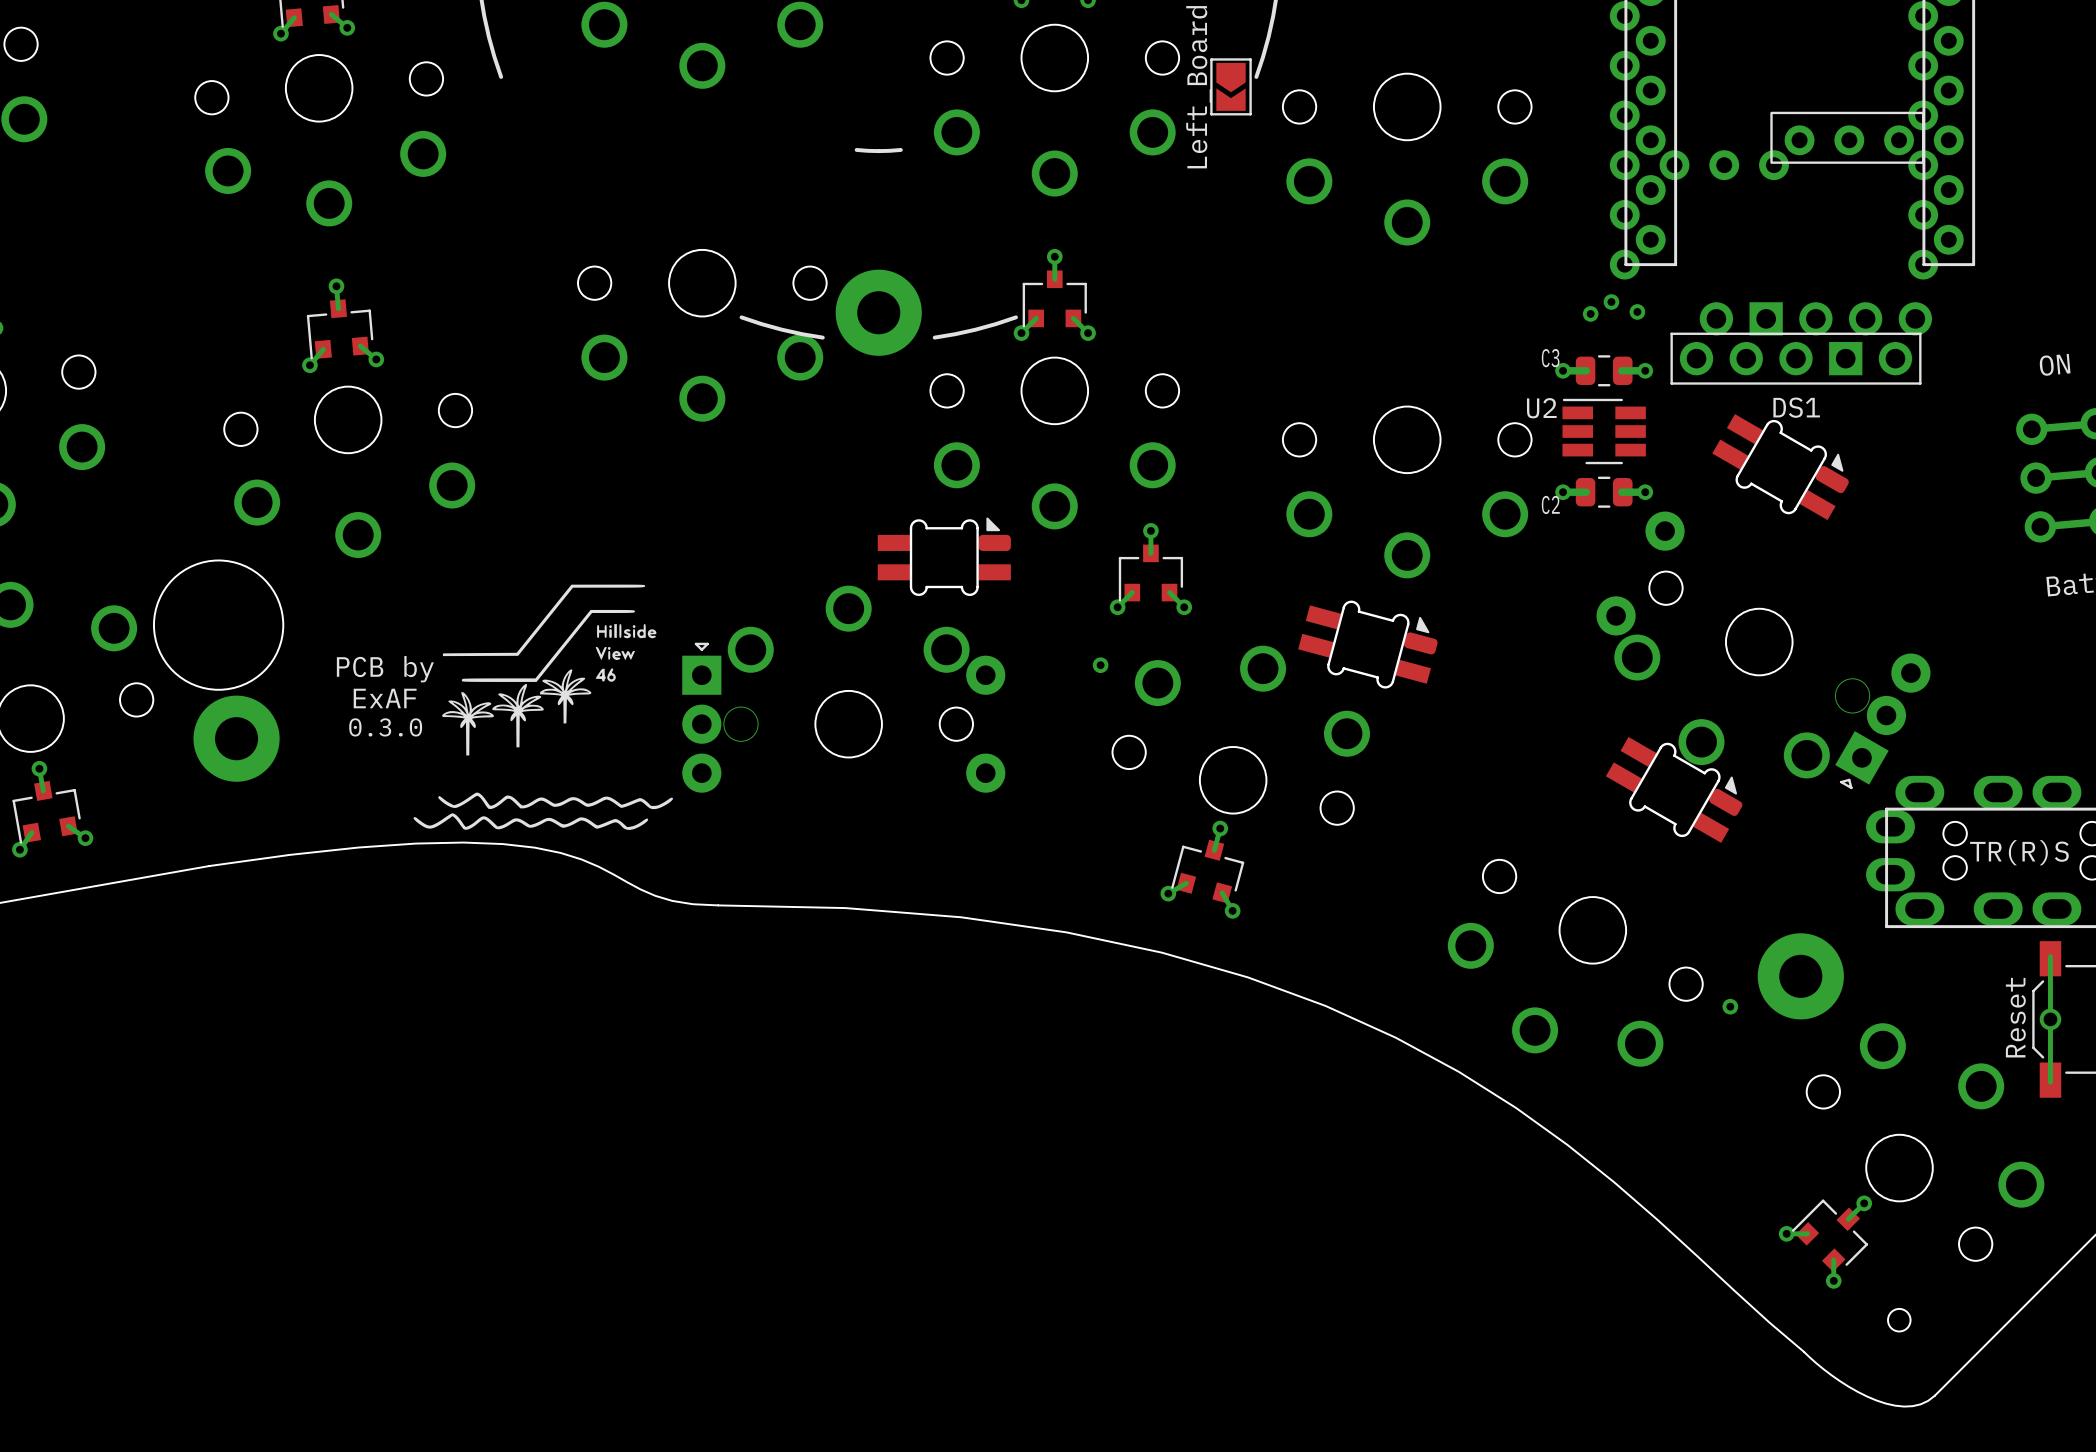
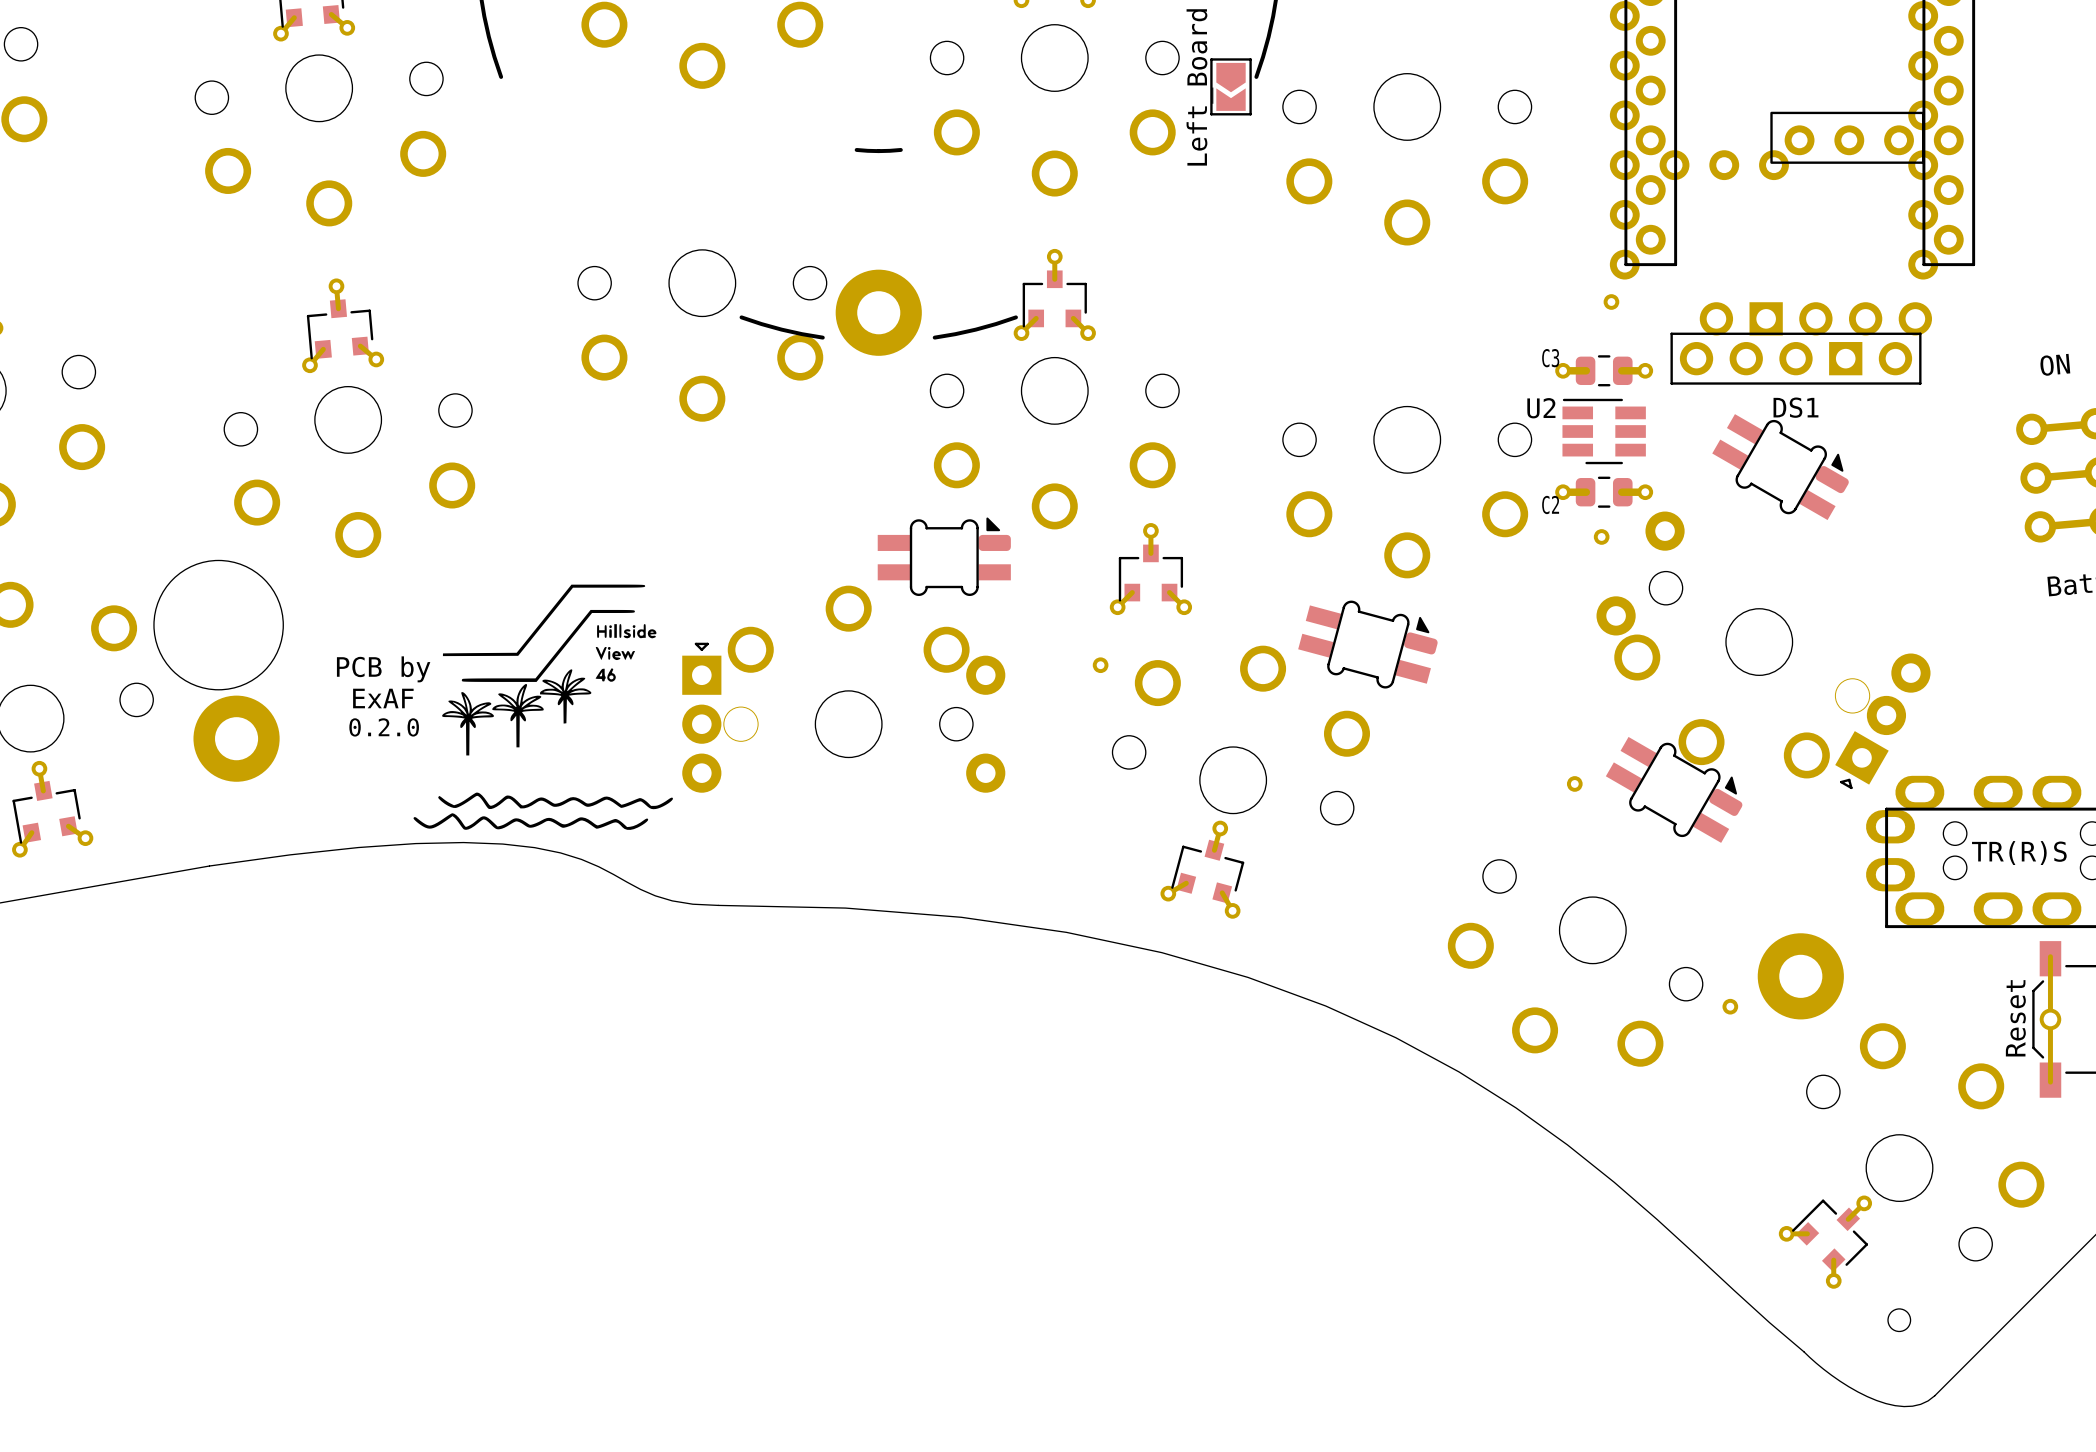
part: (1637, 311) -> none
part: (1590, 313) -> none
part: none -> (1601, 536)
text: 0.3.0 (385, 727) -> 0.2.0 (384, 727)
part: none -> (1574, 783)

